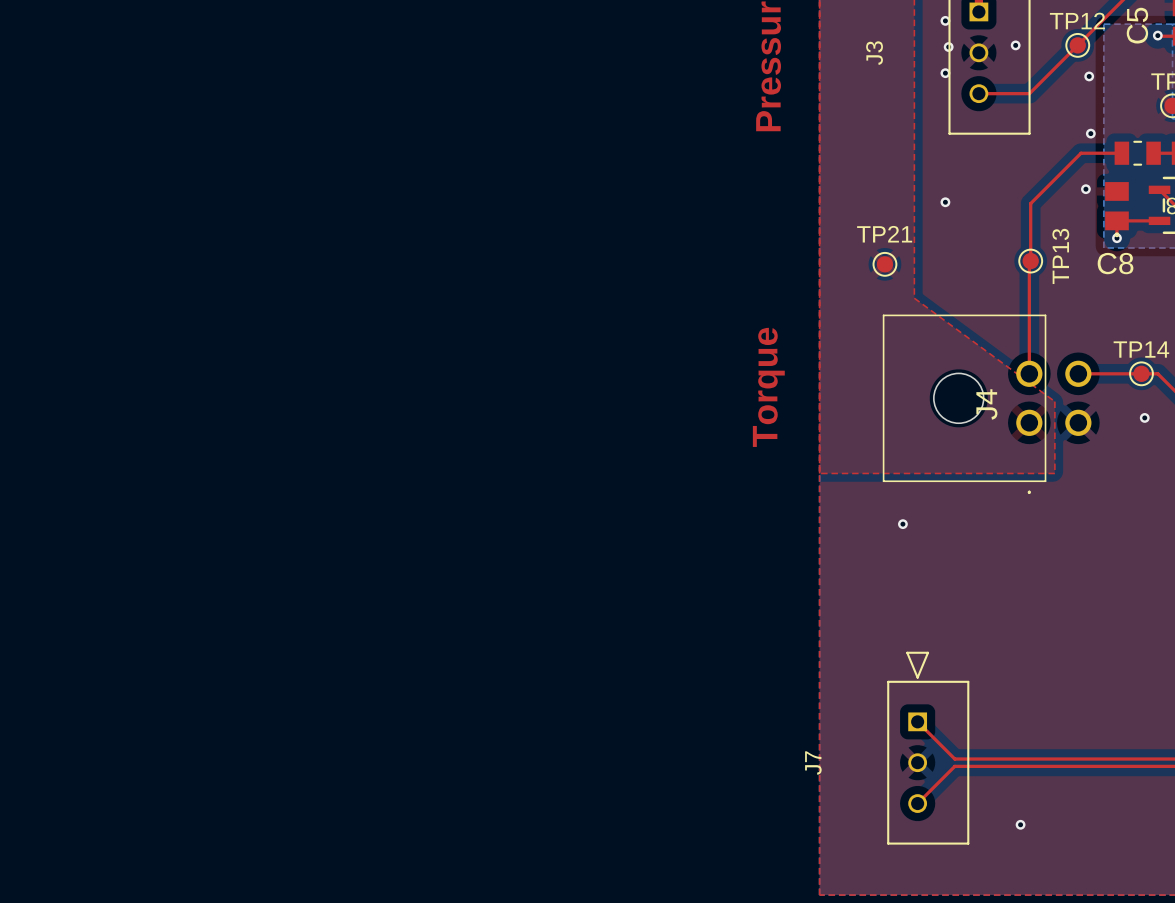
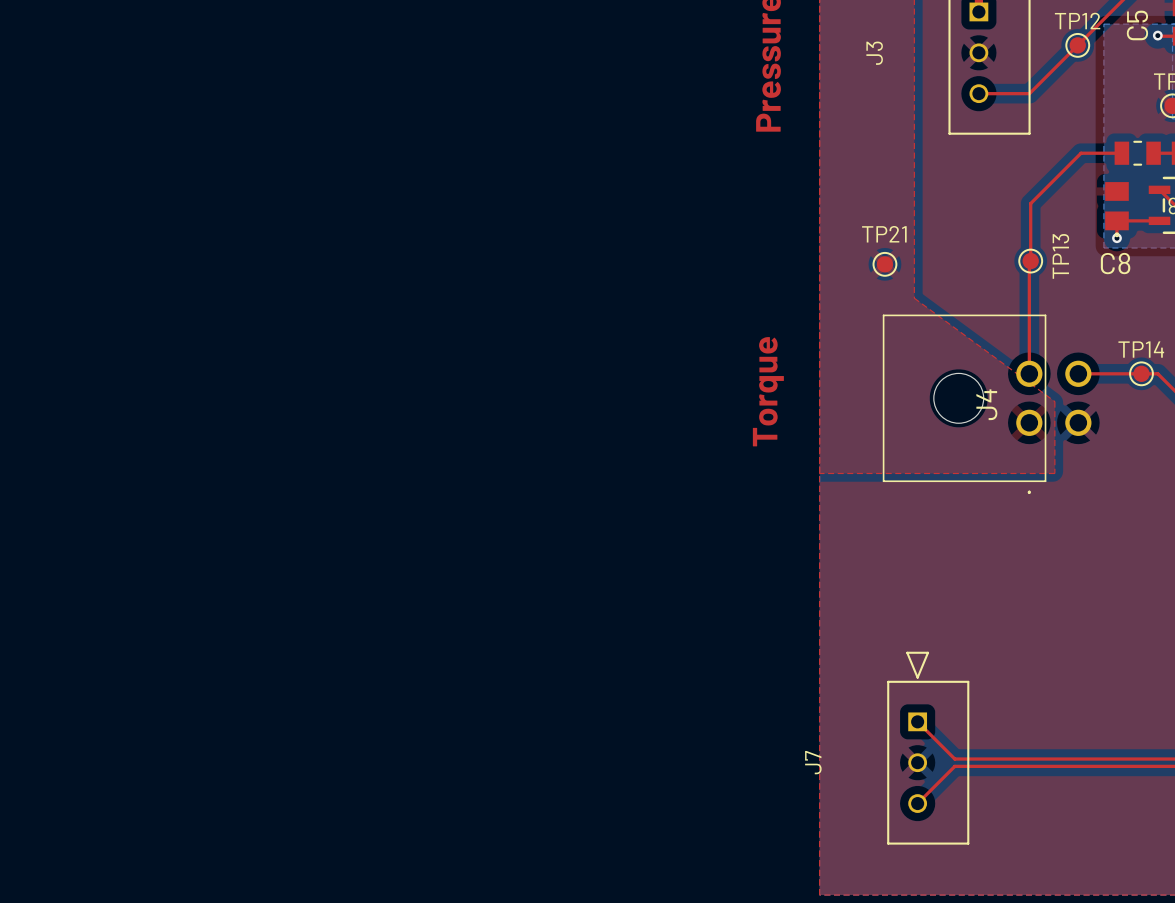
via: (945, 20) -> none
via: (1015, 45) -> none
via: (948, 47) -> none
via: (945, 73) -> none
via: (1089, 76) -> none
via: (1090, 133) -> none
via: (1085, 189) -> none
via: (945, 202) -> none
via: (1144, 417) -> none
via: (902, 524) -> none
via: (1020, 824) -> none

